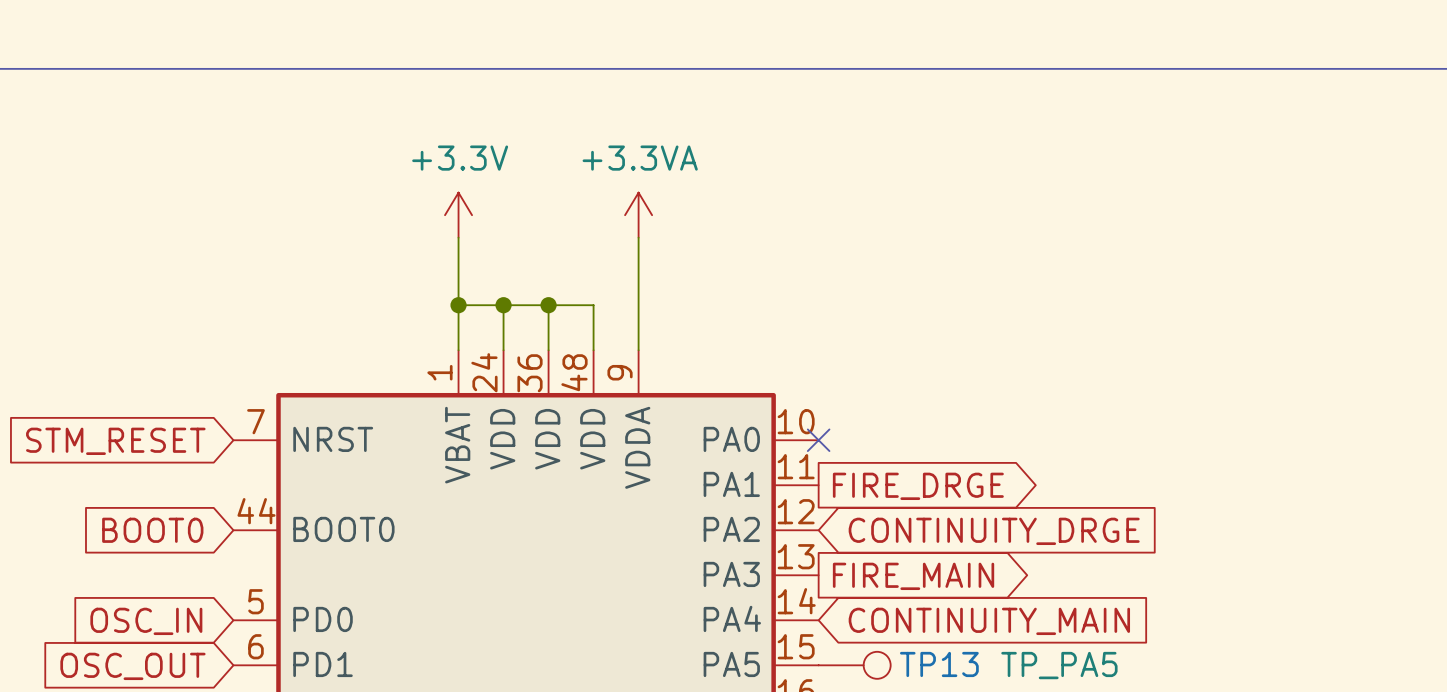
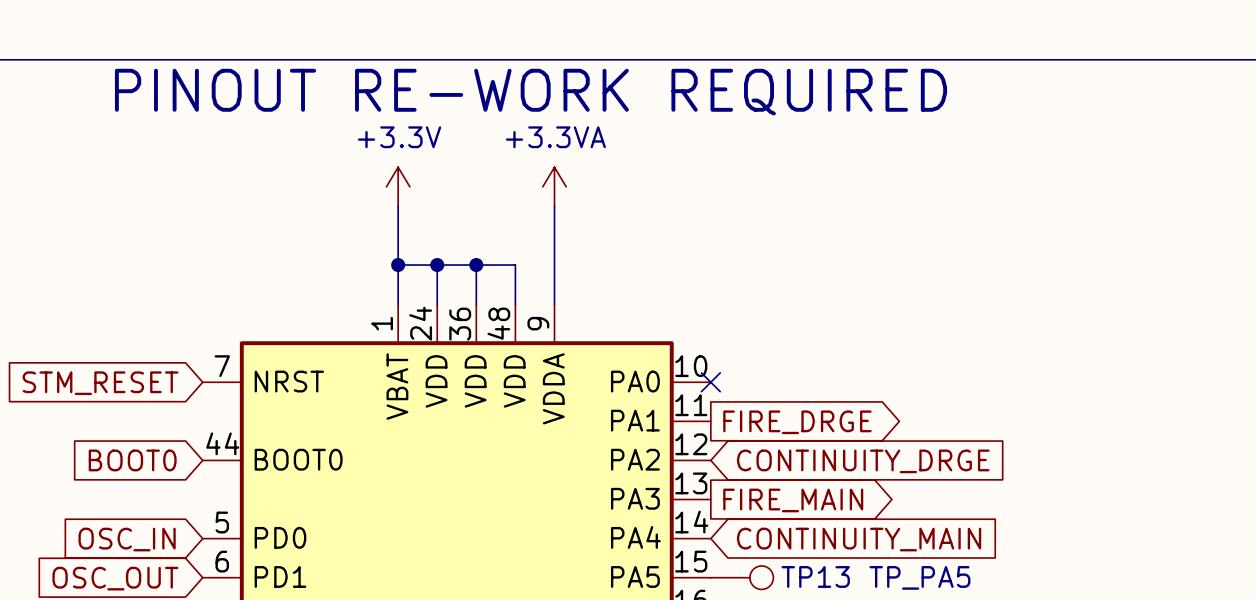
text: none -> PINOUT RE-WORK REQUIRED (531, 92)

